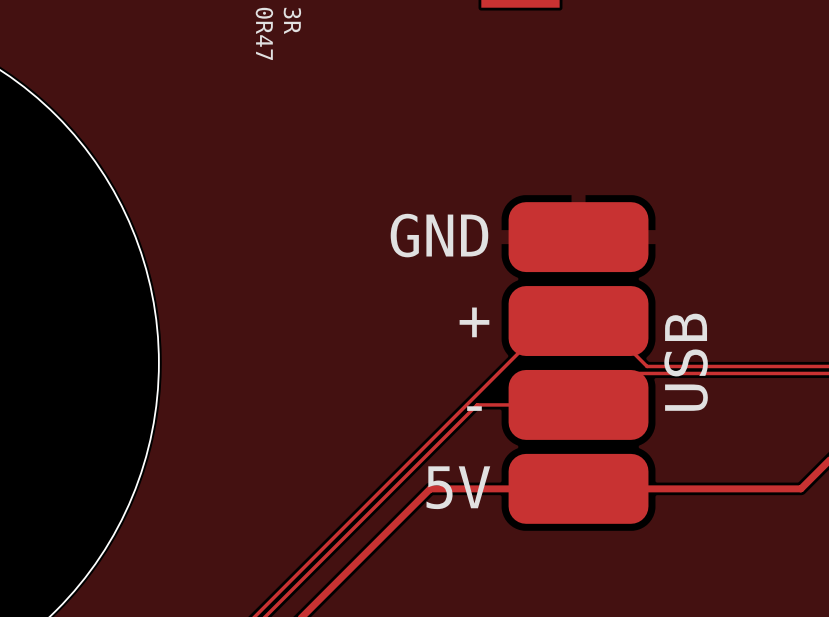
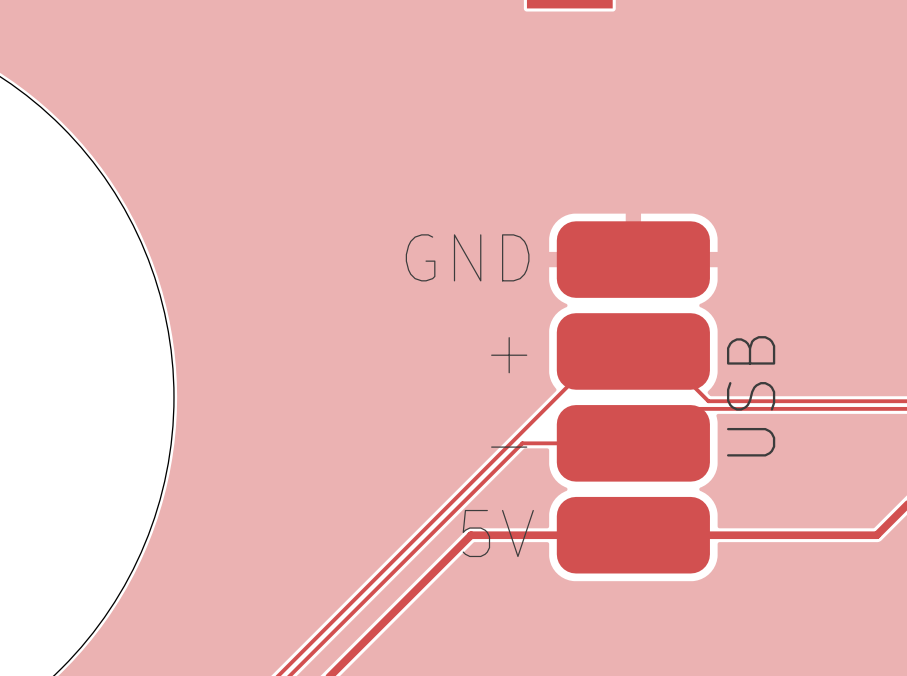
text: 3R (292, 20) -> none
text: 0R47 (264, 33) -> none

